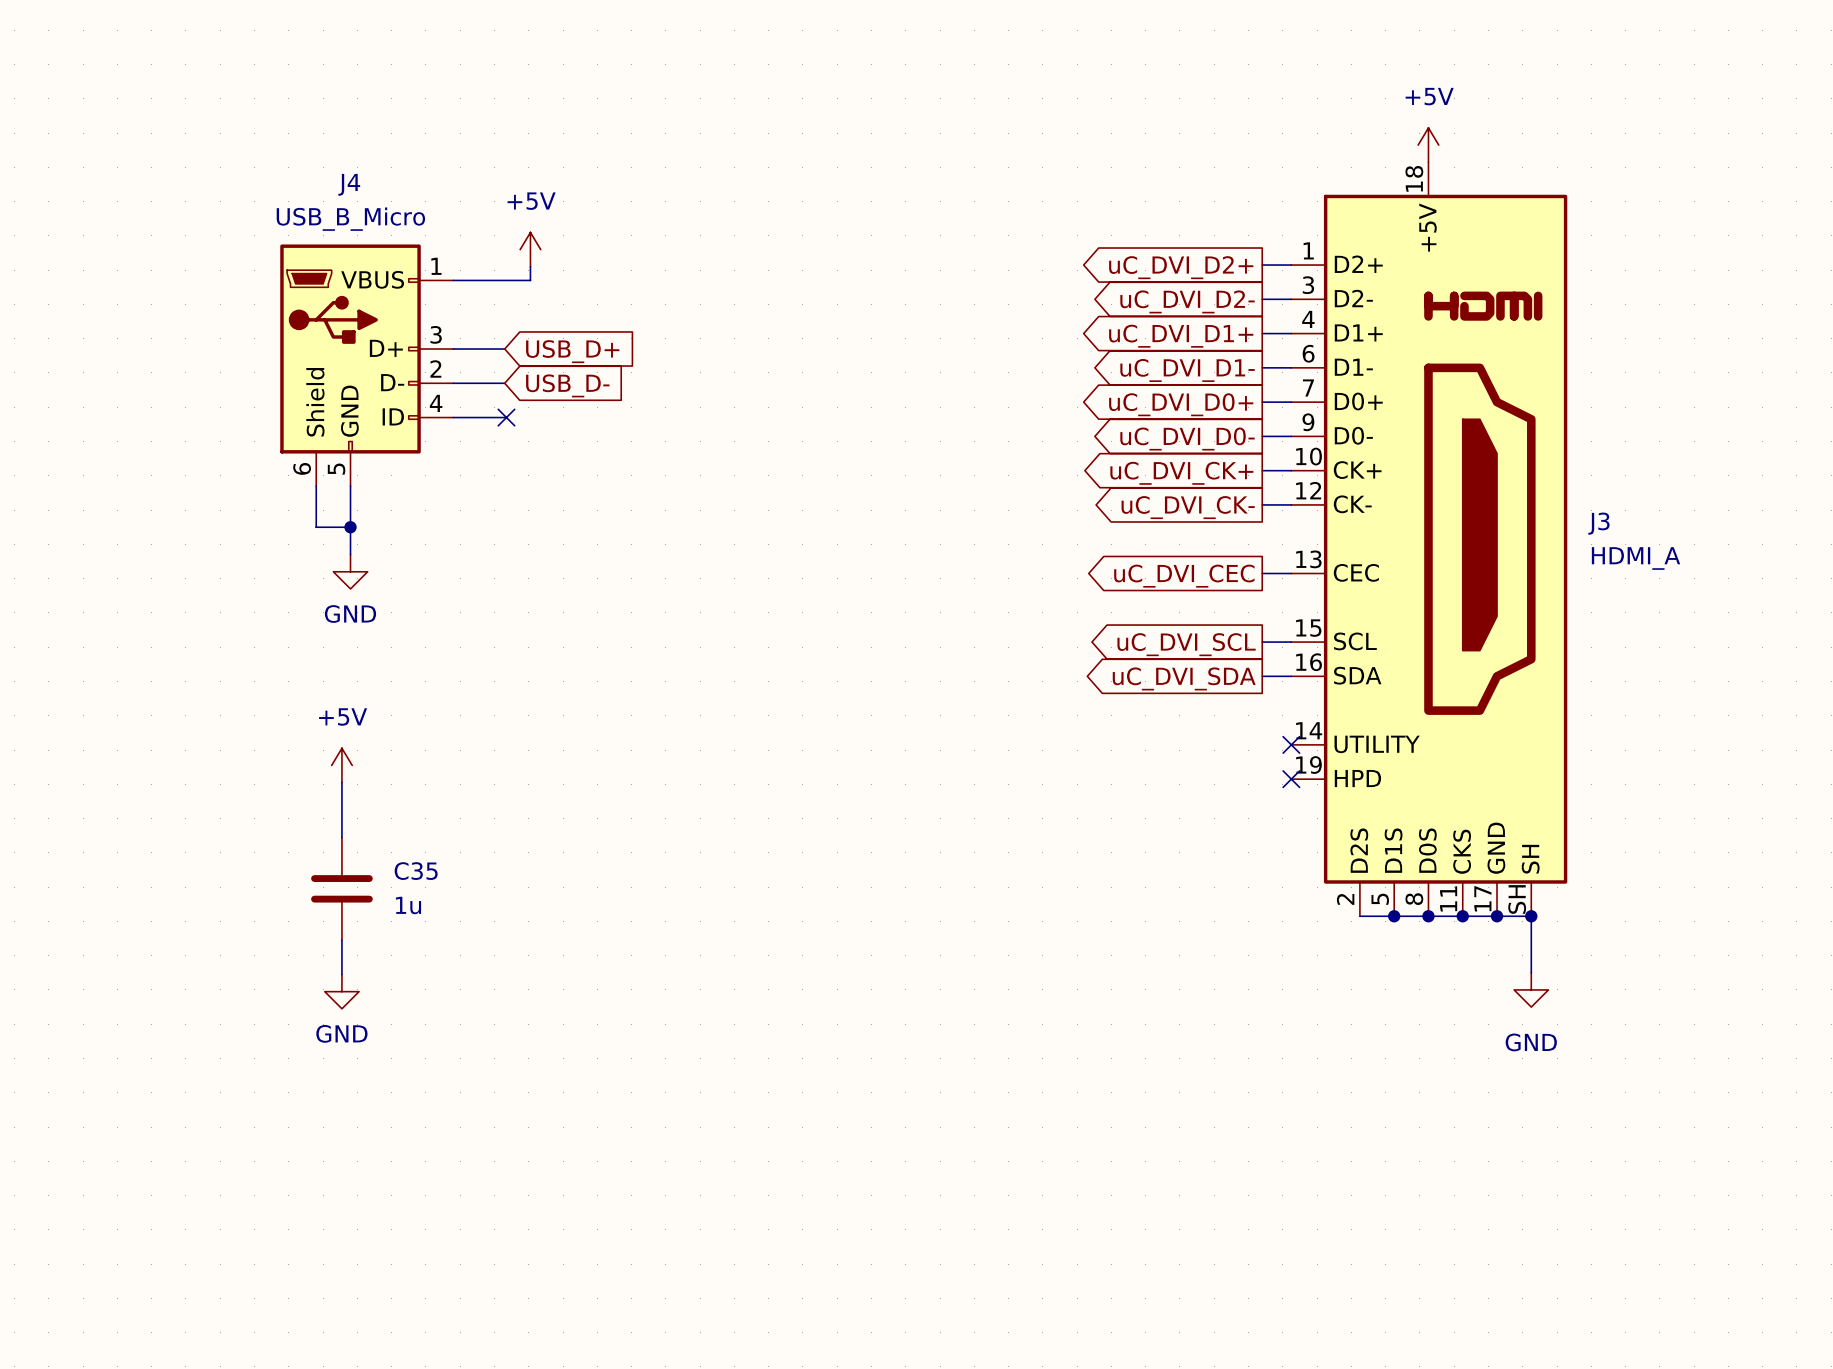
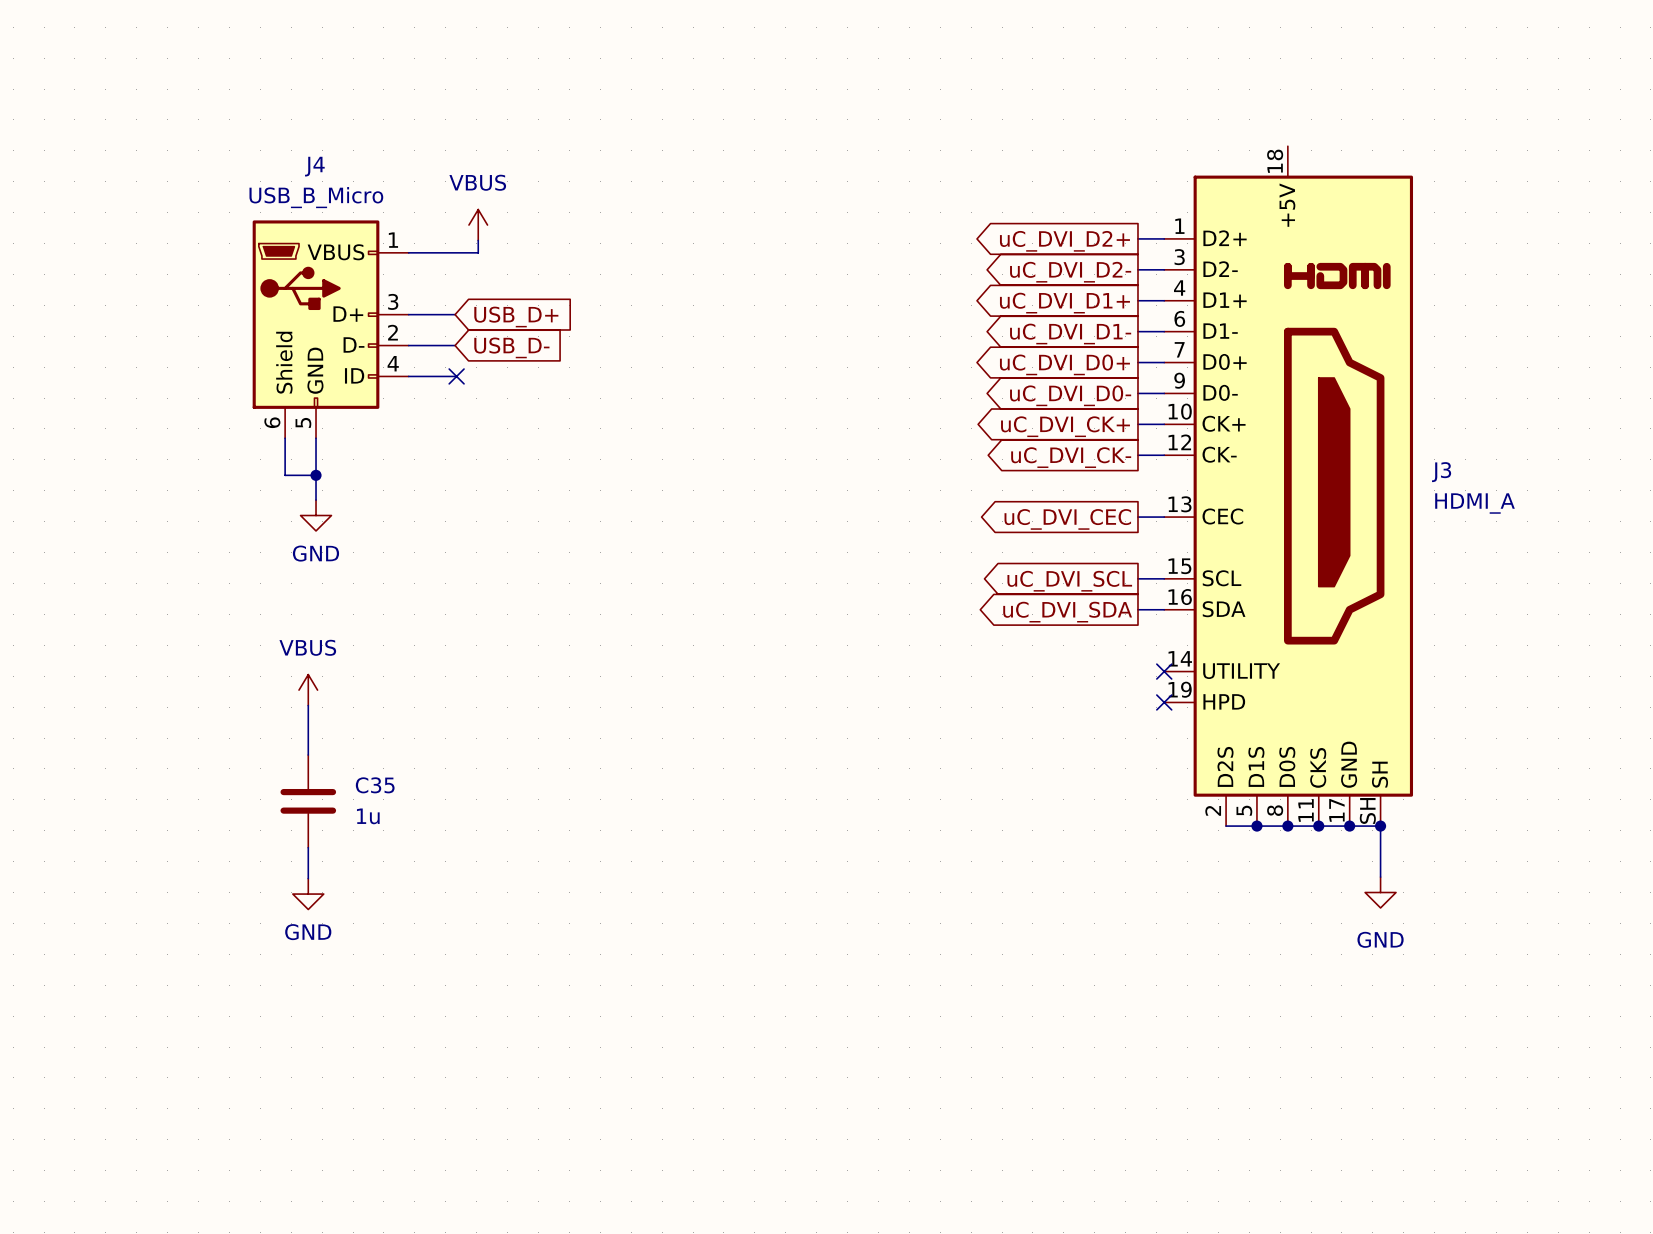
power symbol: +5V (1428, 145) -> none
power symbol: +5V (530, 249) -> VBUS (478, 225)
power symbol: +5V (341, 765) -> VBUS (308, 690)

